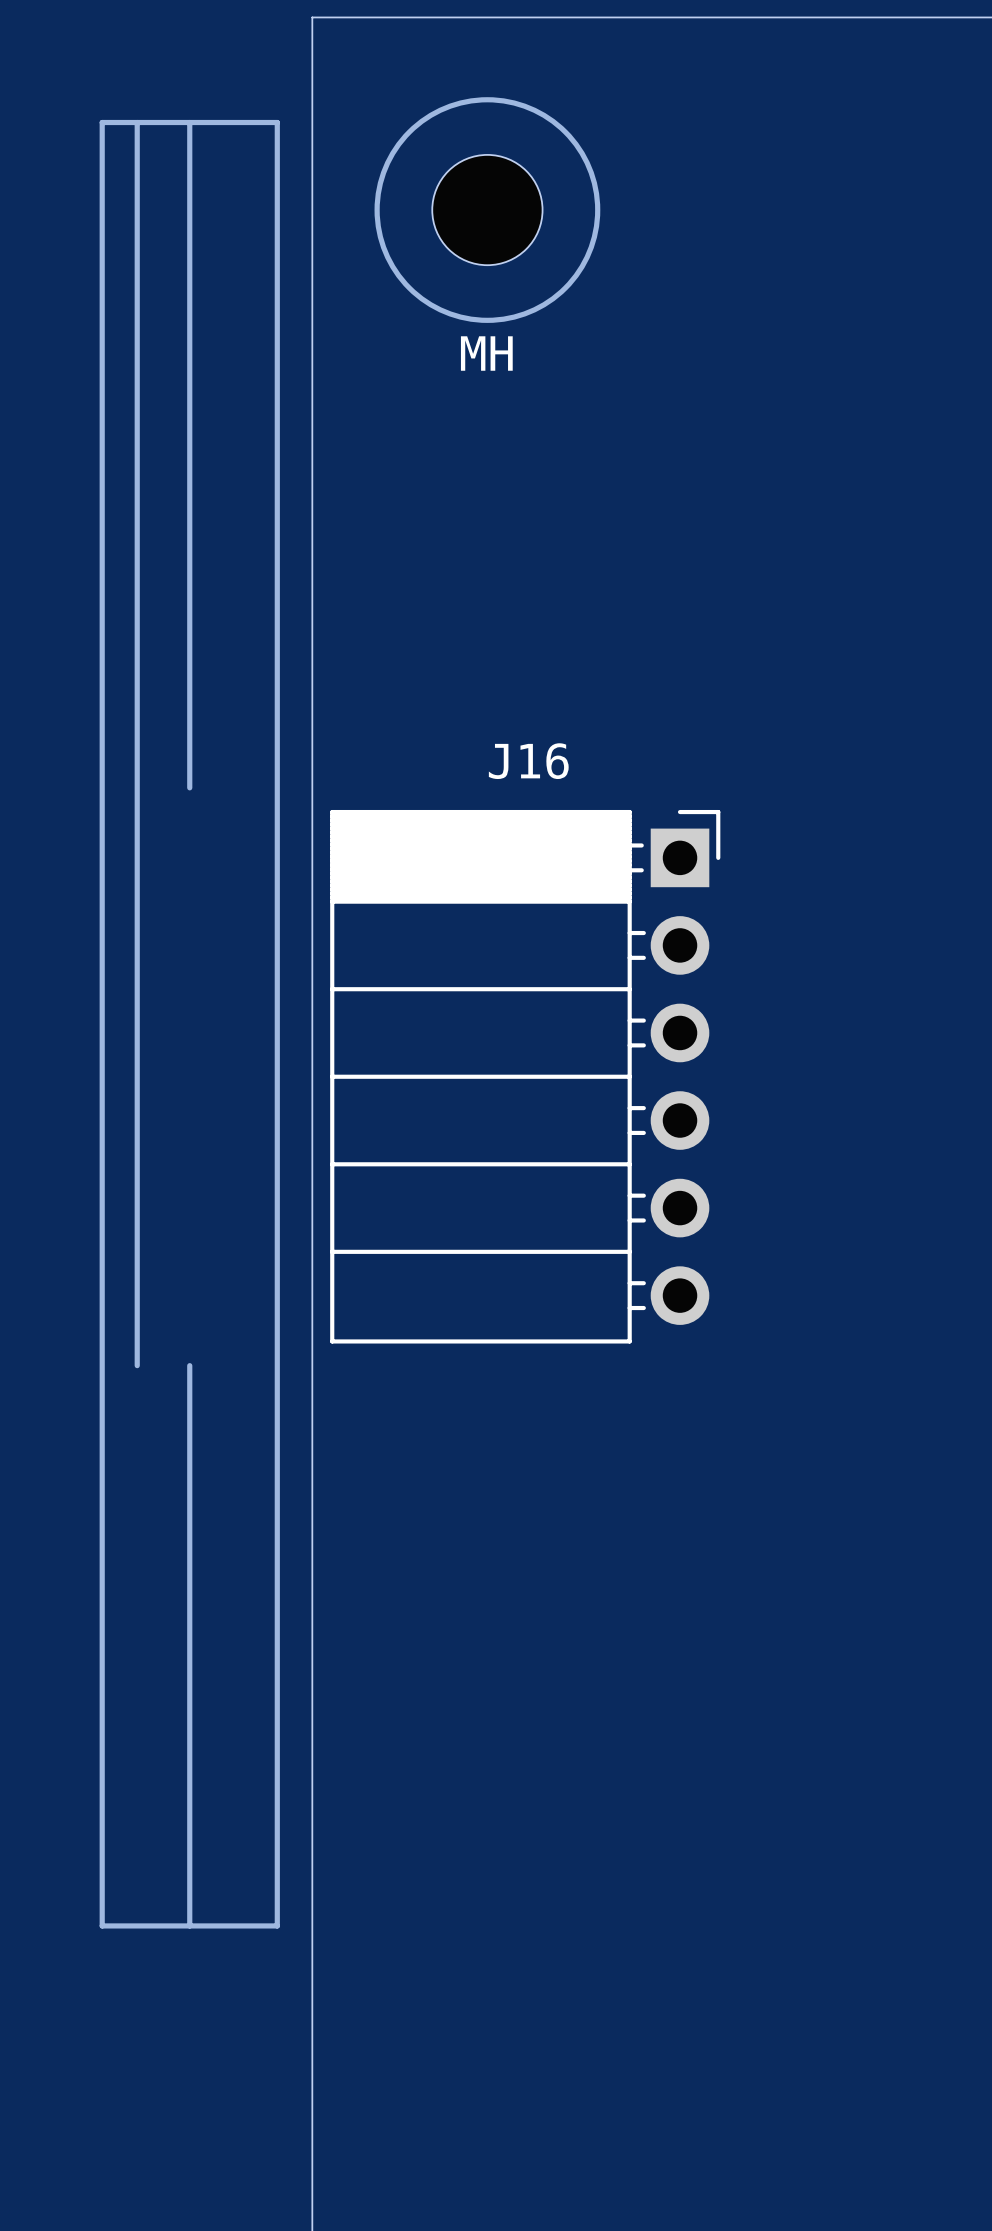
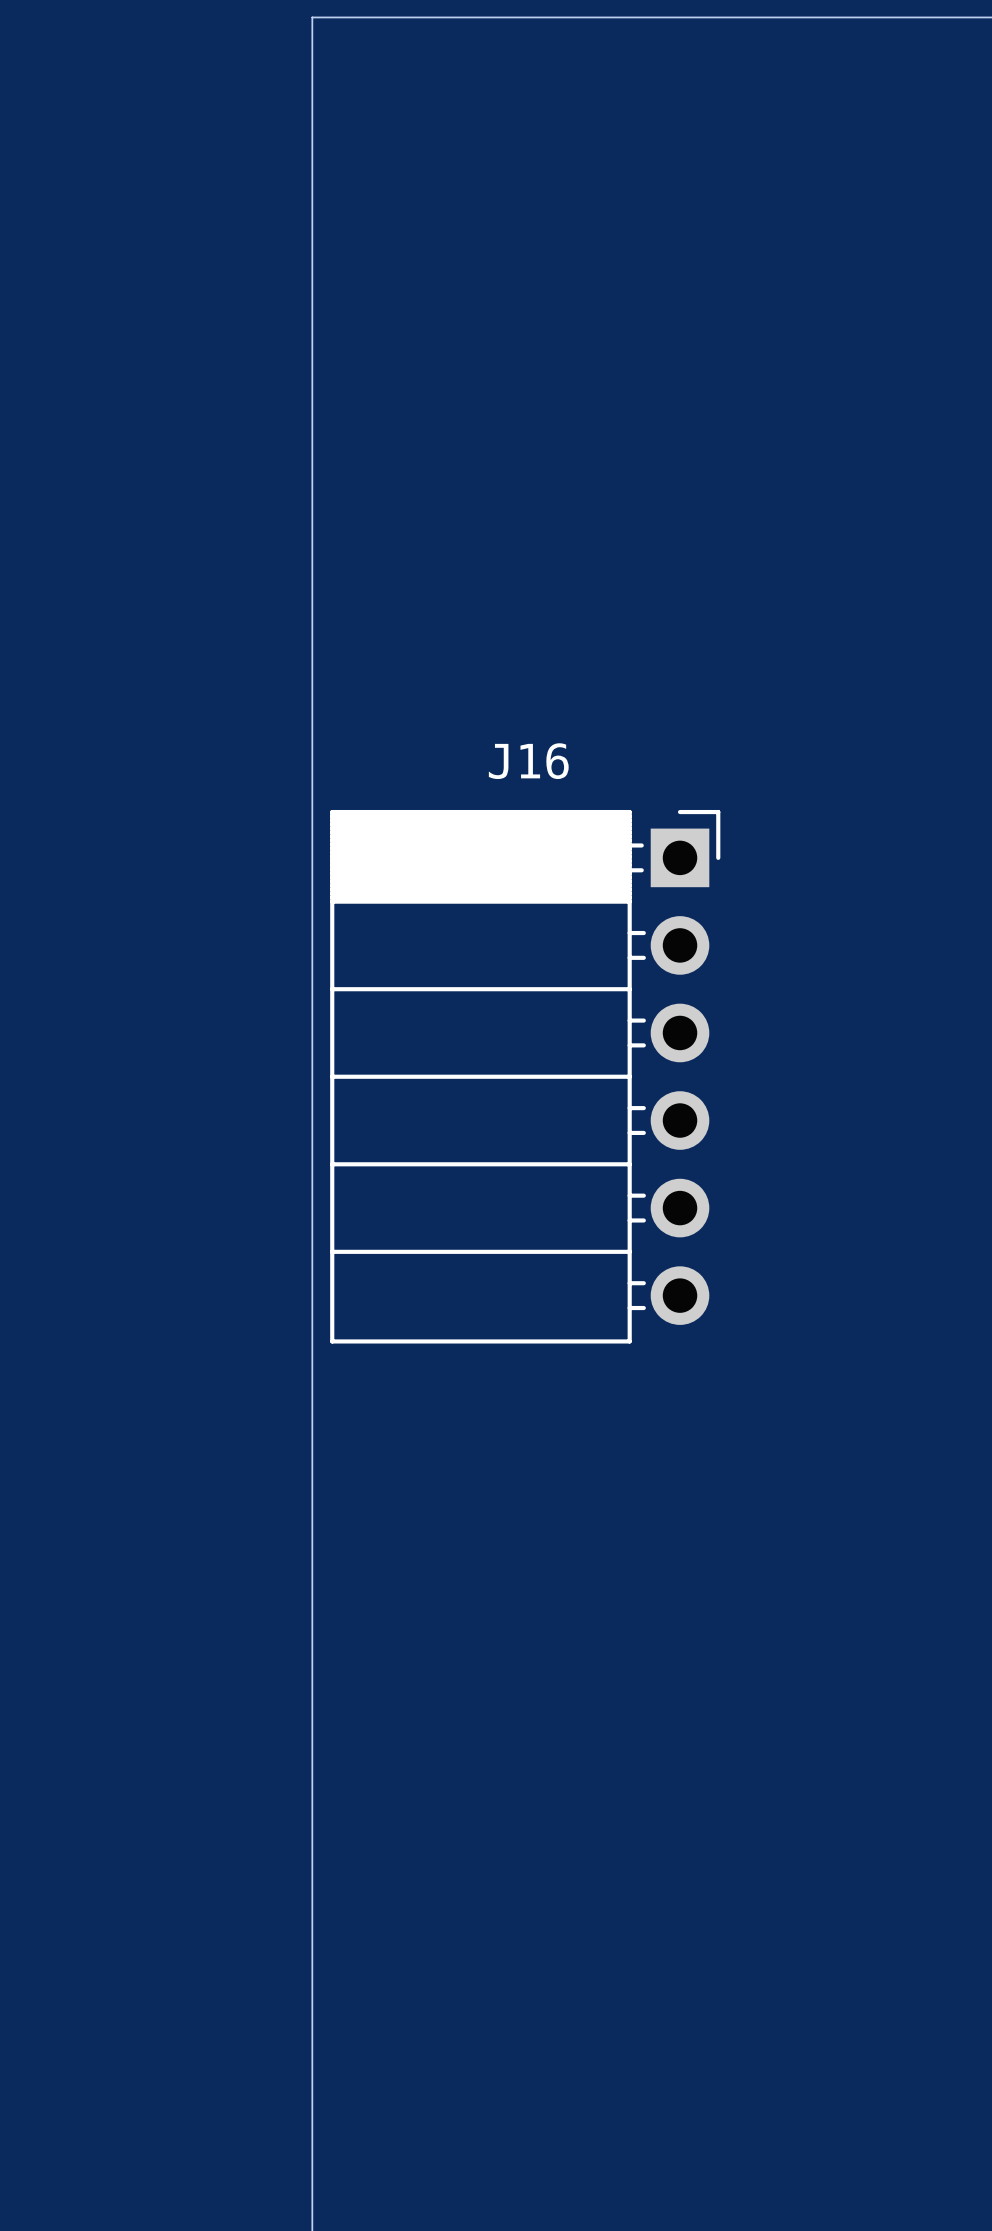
line: (102, 122) (277, 122) (277, 1925) (102, 1925) (102, 122) -> none
line: (137, 122) (137, 1365) -> none
line: (189, 122) (189, 787) -> none
MH: (487, 210) -> none
line: (189, 1365) (189, 1925) -> none

